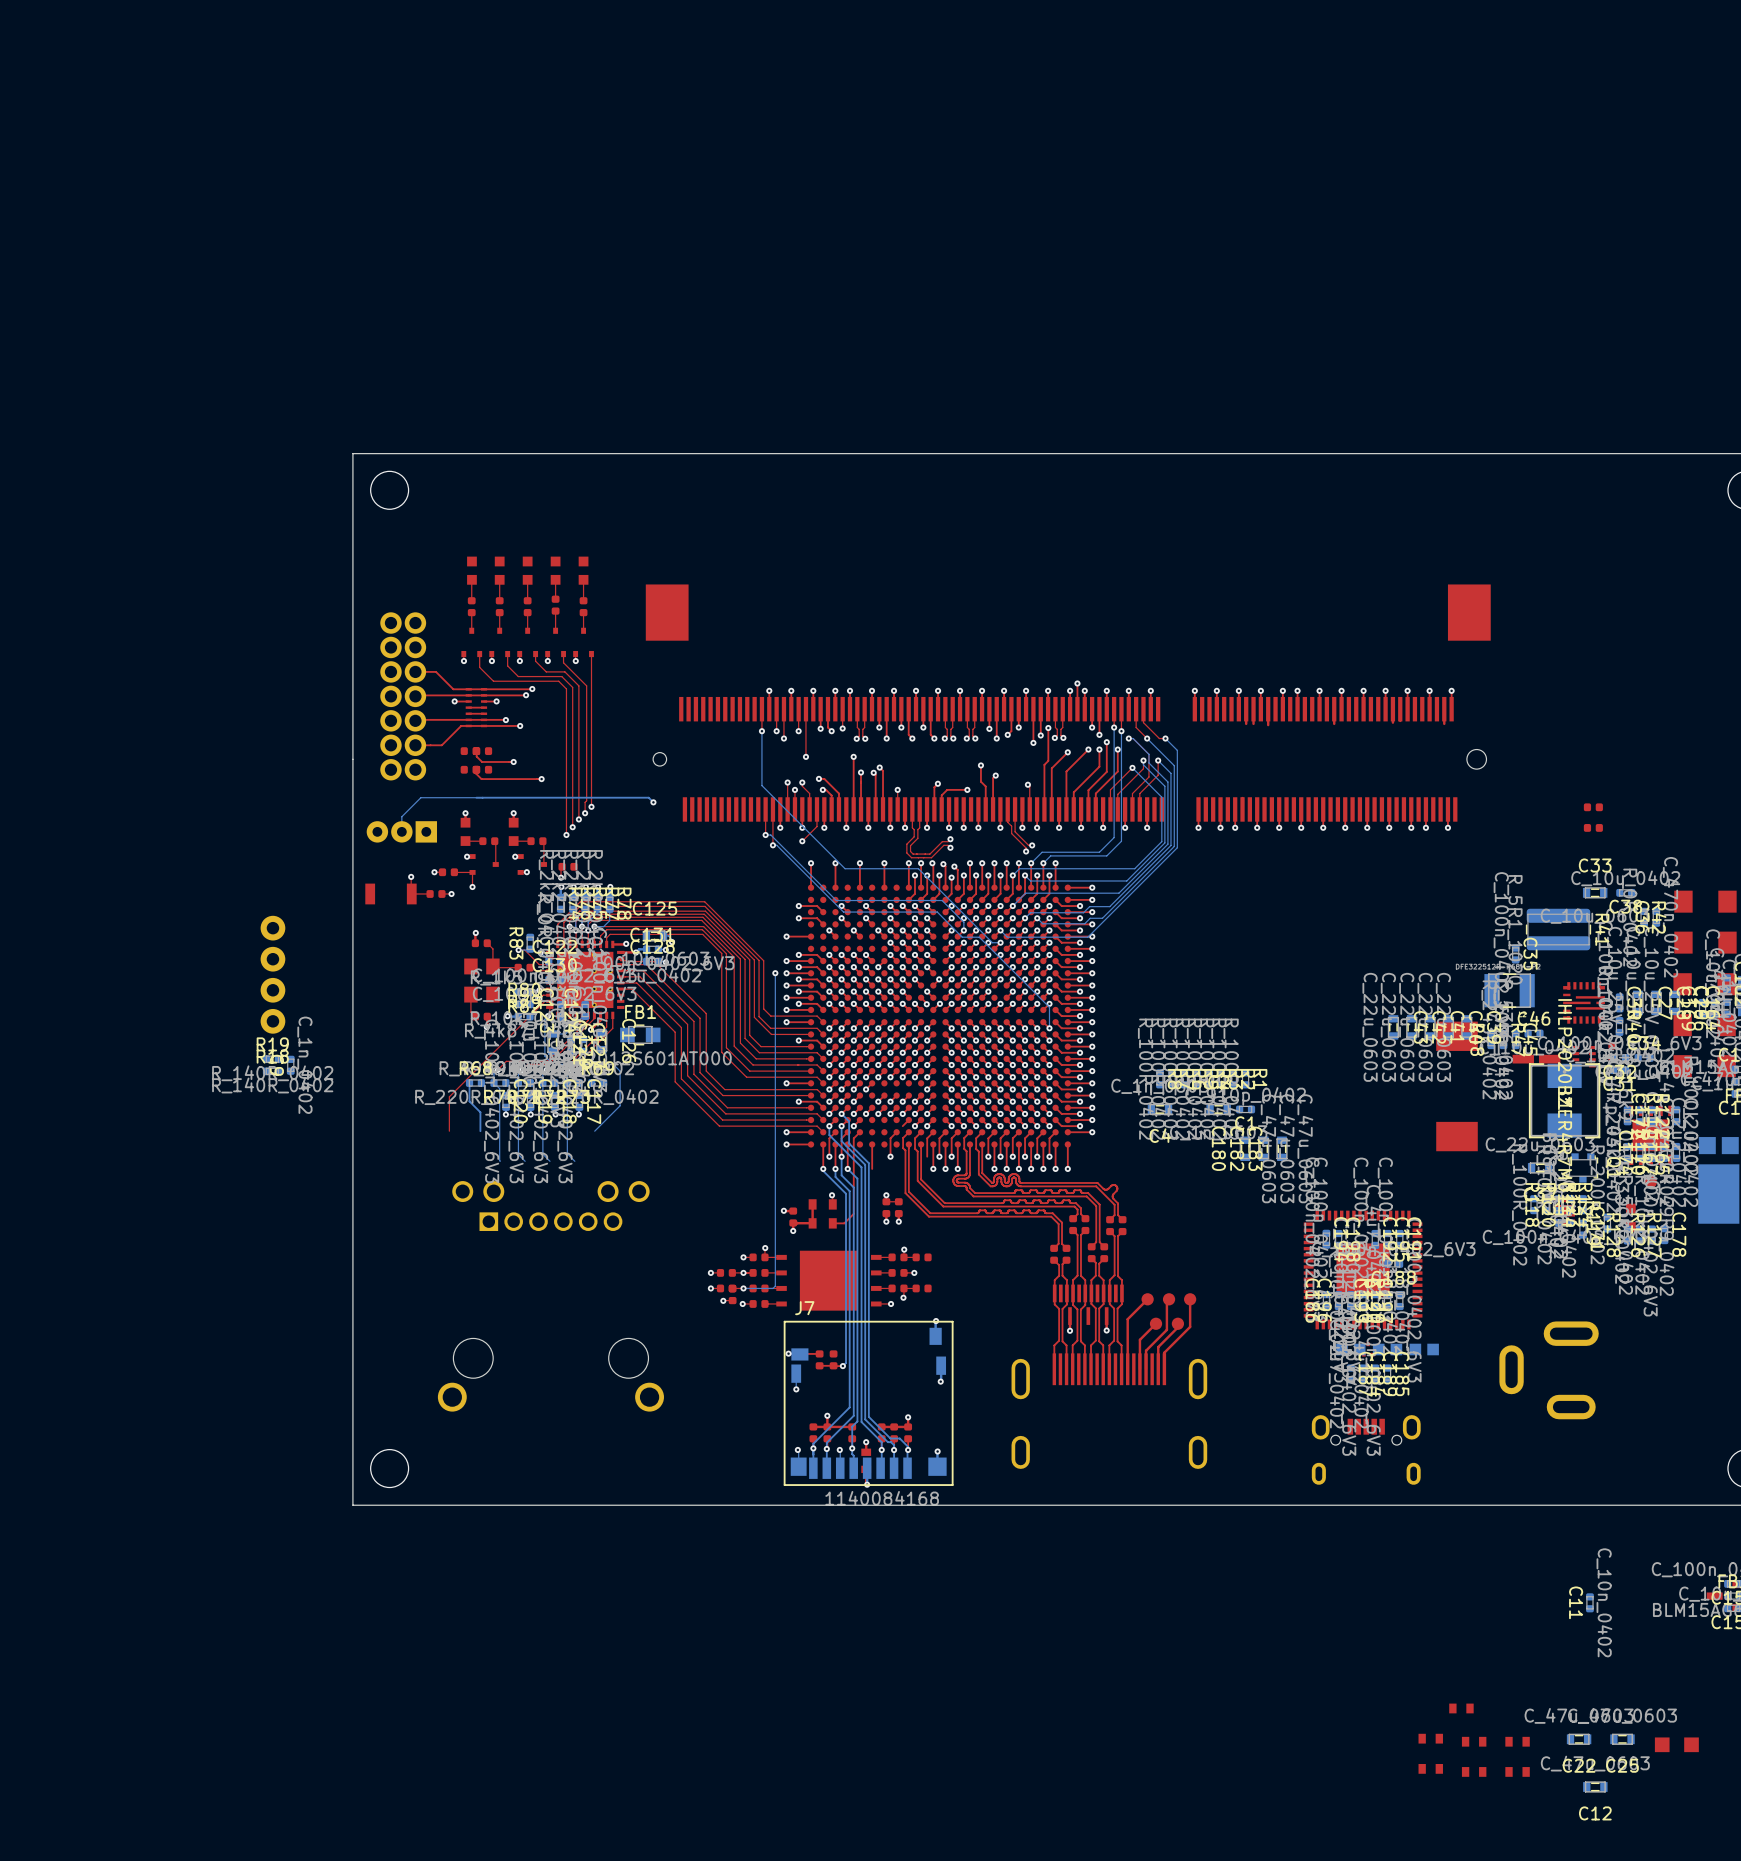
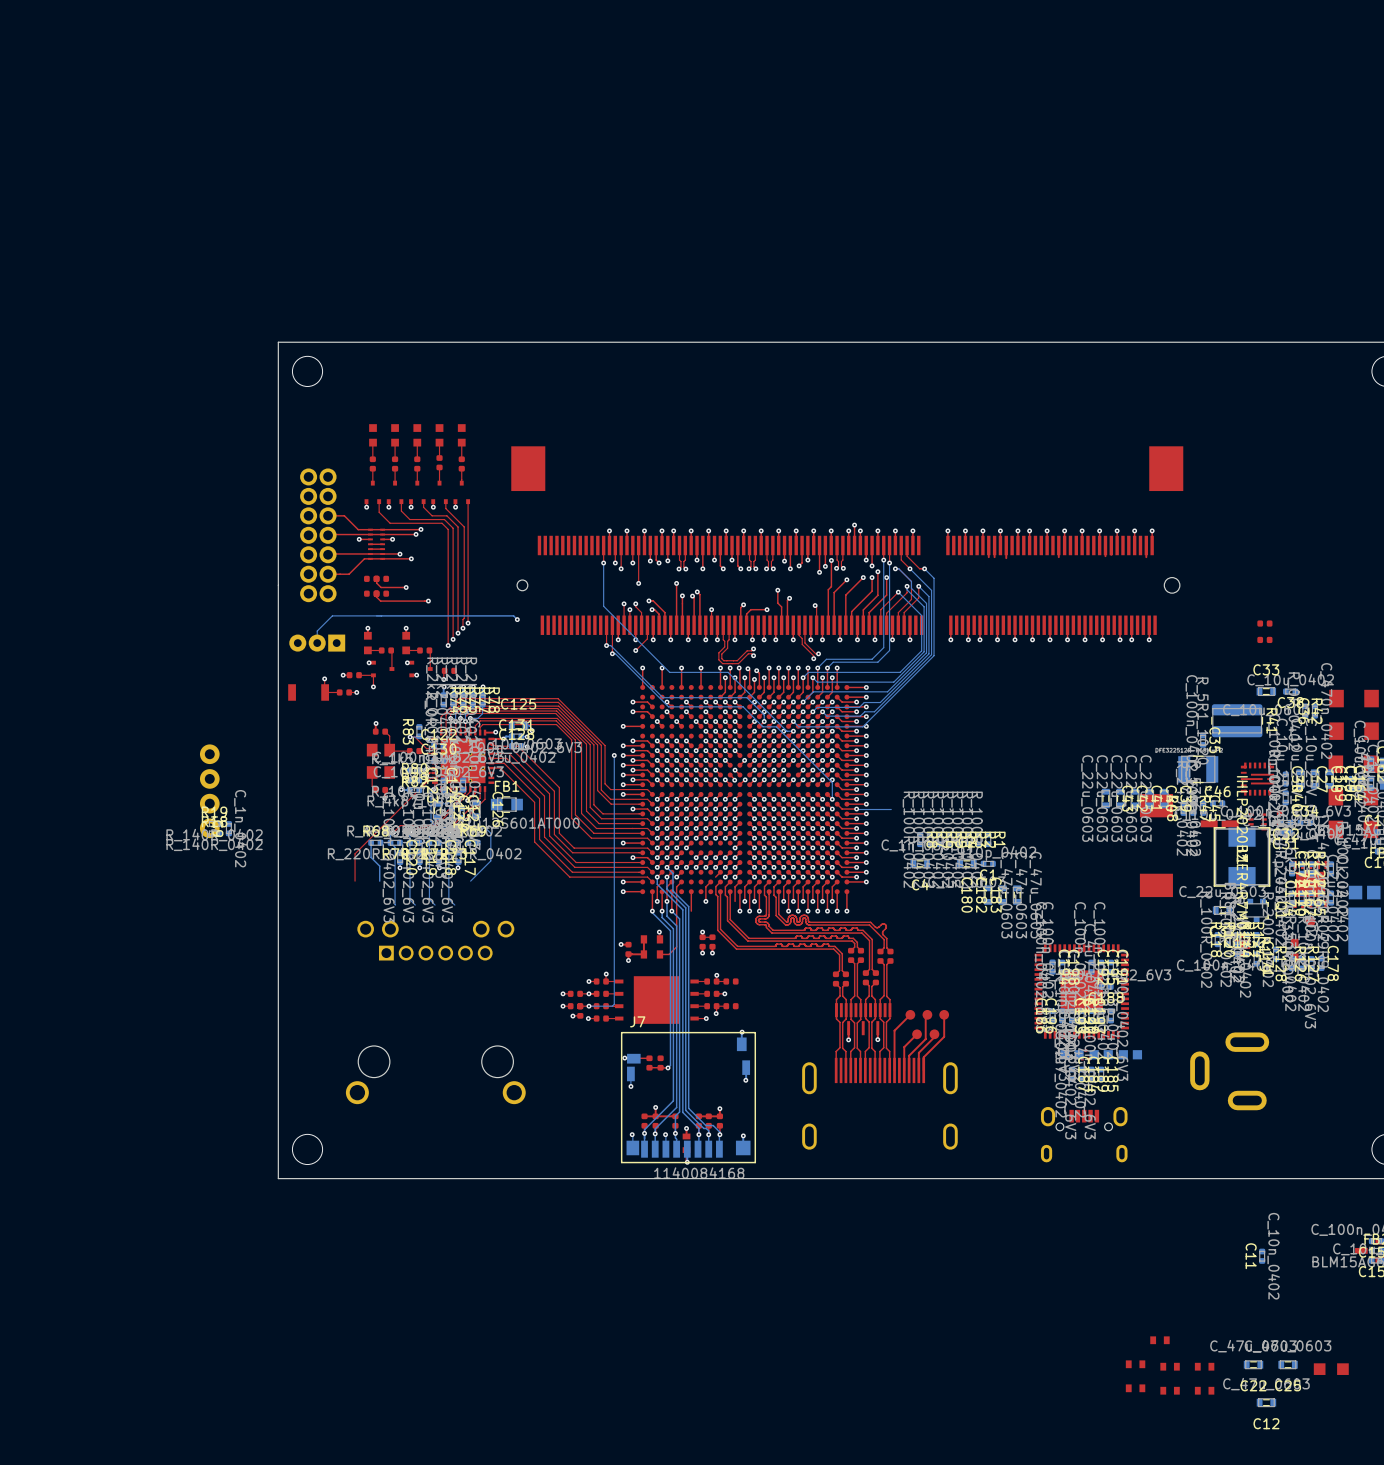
part position: (272, 974) -> (209, 791)
bottom track: none -> (856, 809) (891, 809)

